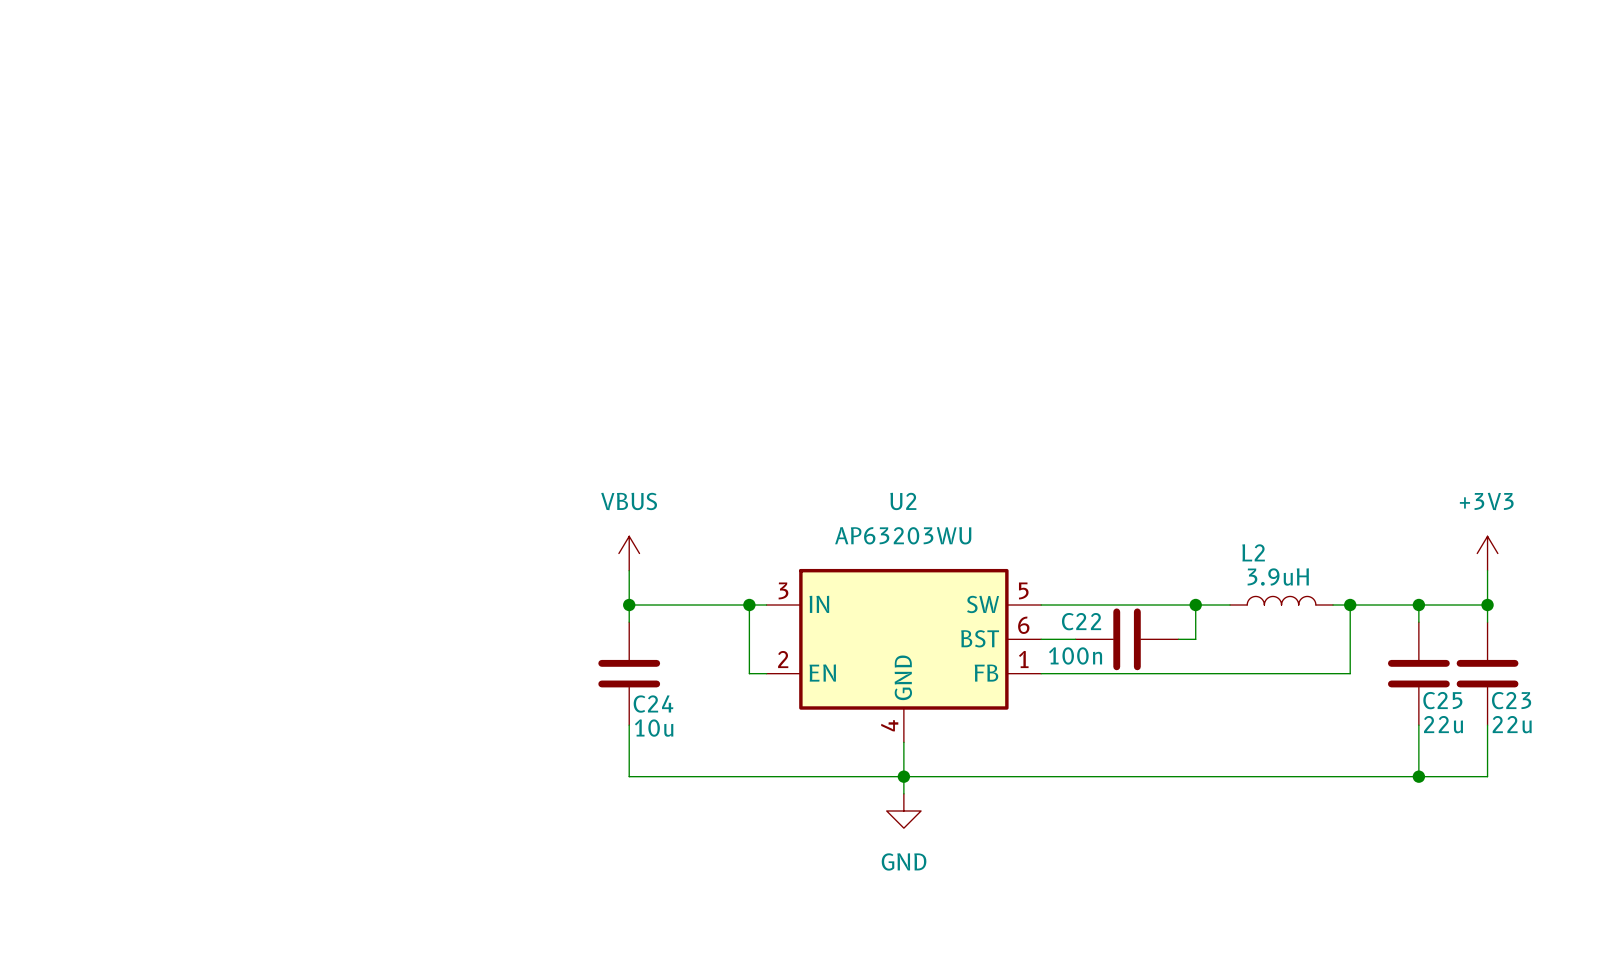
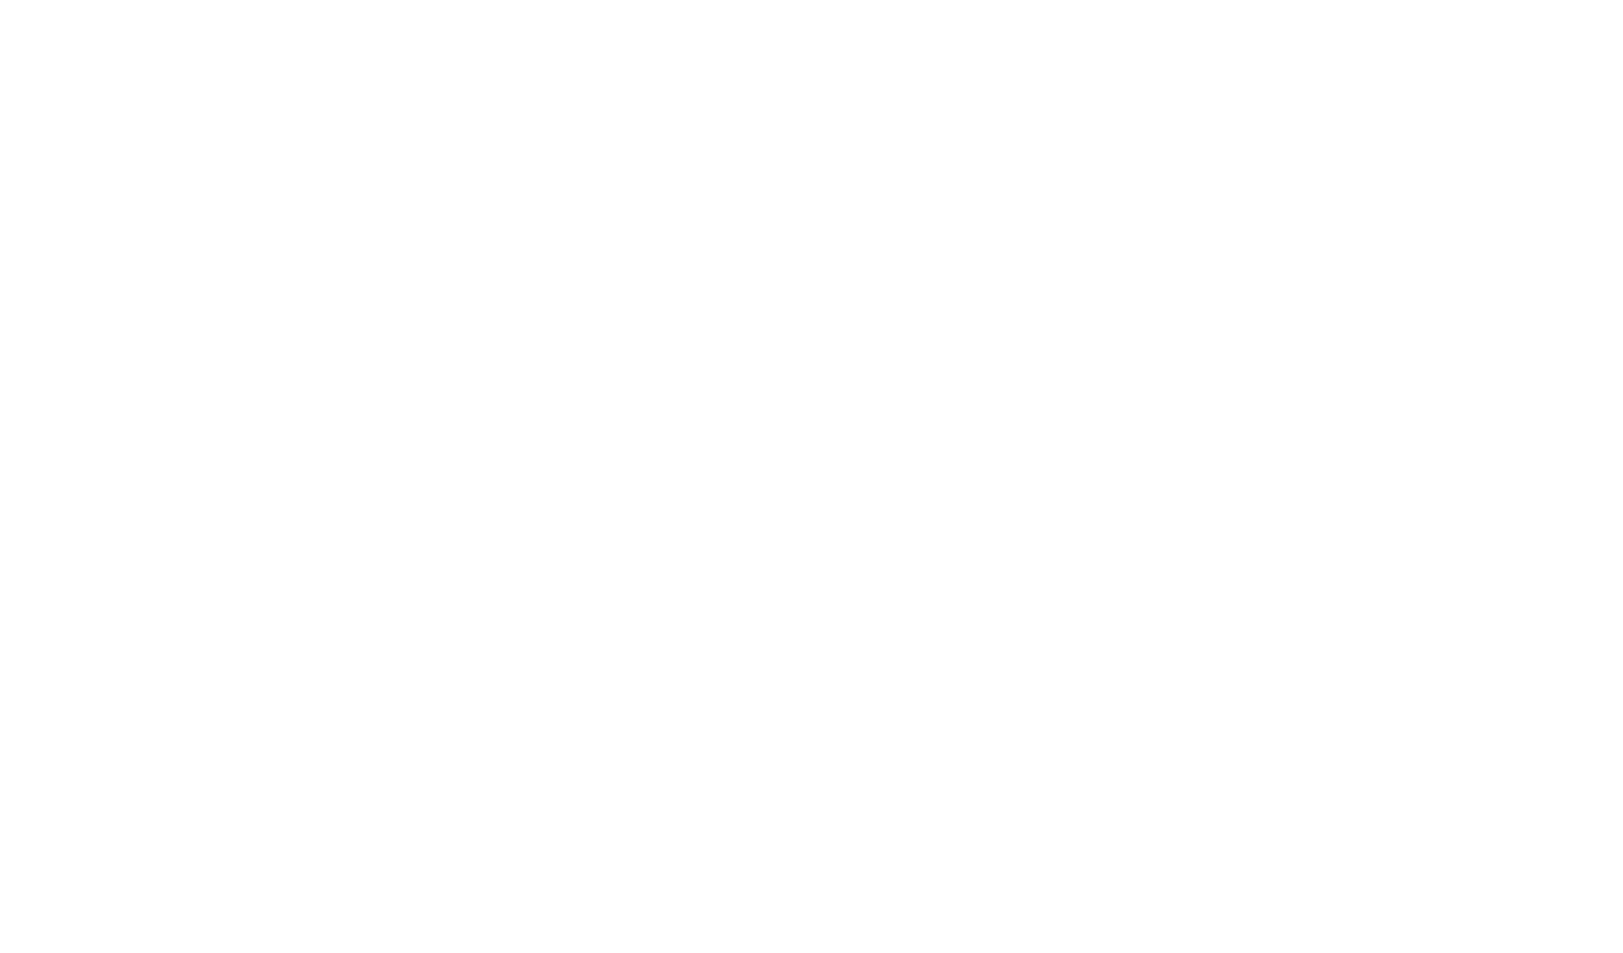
power symbol: VBUS (629, 553) -> none
power symbol: +3V3 (1487, 553) -> none
wire: (629, 570) (629, 622) -> none
wire: (1487, 570) (1487, 622) -> none
L2: 3.9uH (1281, 600) -> none
wire: (629, 605) (766, 605) -> none
junction: (629, 605) -> none
wire: (749, 605) (749, 673) (766, 673) -> none
junction: (749, 605) -> none
wire: (1041, 605) (1230, 605) -> none
wire: (1195, 605) (1195, 639) (1178, 639) -> none
junction: (1195, 605) -> none
wire: (1333, 605) (1487, 605) -> none
wire: (1350, 605) (1350, 673) (1041, 673) -> none
junction: (1350, 605) -> none
wire: (1418, 605) (1418, 622) -> none
junction: (1418, 605) -> none
junction: (1487, 605) -> none
wire: (1041, 639) (1075, 639) -> none
C22: 100n (1127, 639) -> none
U2: AP63203WU (903, 655) -> none
C24: 10u (629, 673) -> none
C25: 22u (1418, 673) -> none
C23: 22u (1487, 673) -> none
wire: (629, 725) (629, 776) (1487, 776) (1487, 725) -> none
wire: (1418, 725) (1418, 776) -> none
wire: (903, 742) (903, 793) -> none
junction: (903, 776) -> none
junction: (1418, 776) -> none
power symbol: GND (903, 811) -> none

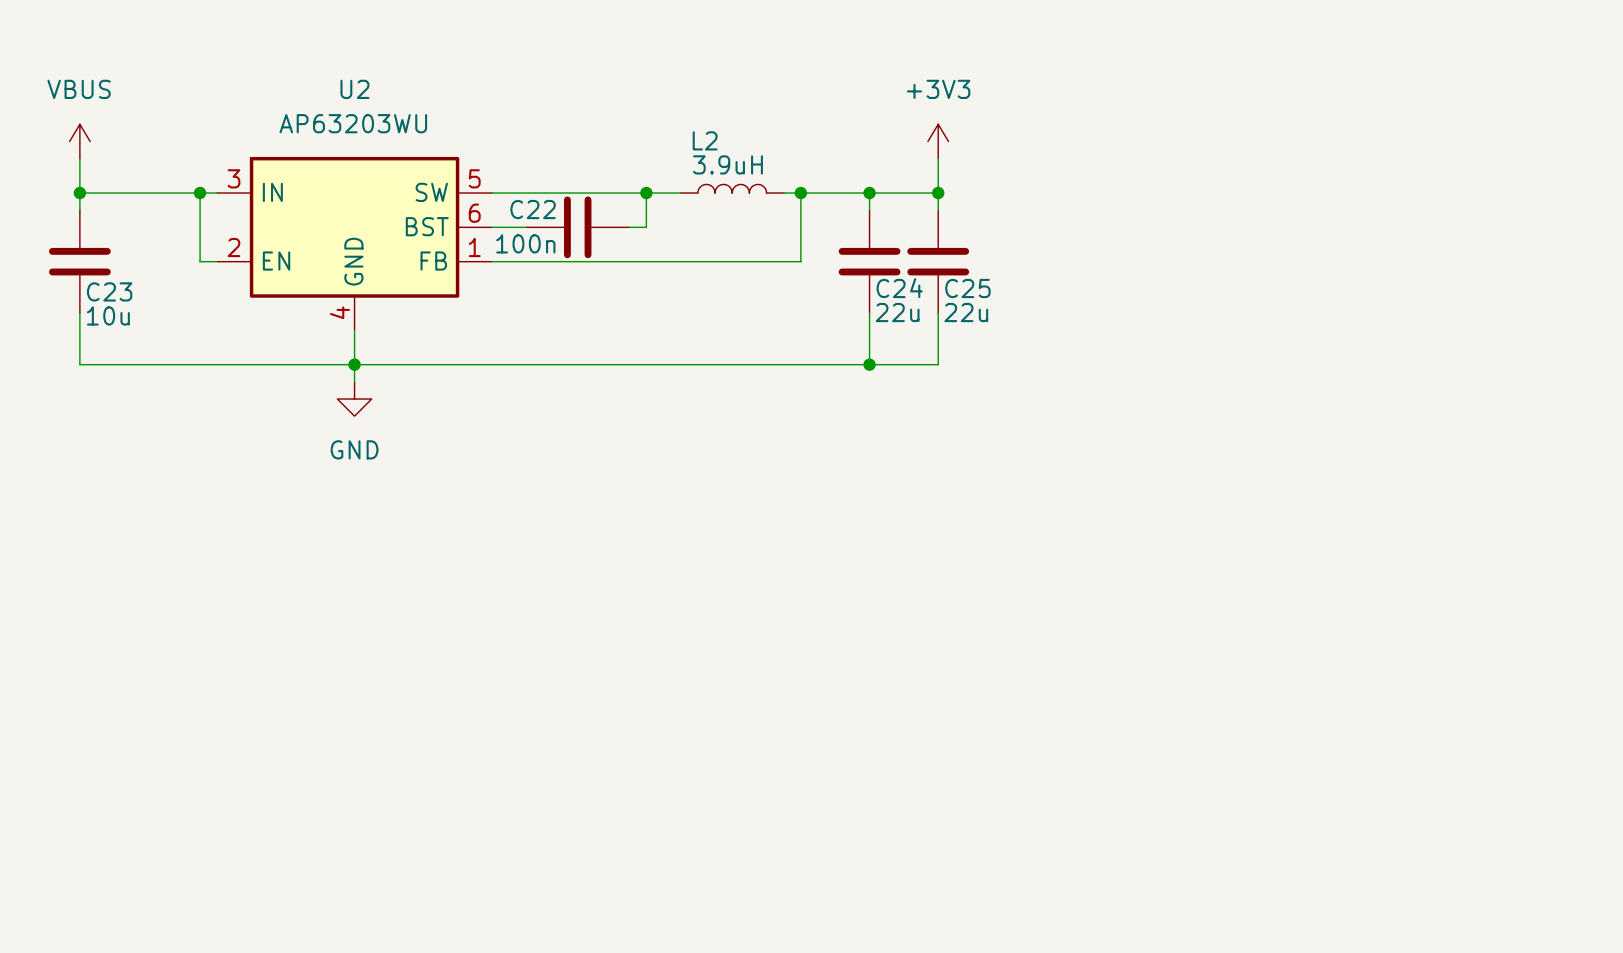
power symbol: none -> VBUS (79, 141)
power symbol: none -> +3V3 (938, 141)
wire: none -> (79, 158) (79, 210)
wire: none -> (938, 158) (938, 210)
L2: none -> 3.9uH (732, 188)
wire: none -> (79, 193) (217, 193)
junction: none -> (79, 193)
wire: none -> (200, 193) (200, 261) (217, 261)
junction: none -> (200, 193)
wire: none -> (491, 193) (680, 193)
wire: none -> (646, 193) (646, 227) (629, 227)
junction: none -> (646, 193)
wire: none -> (783, 193) (938, 193)
wire: none -> (800, 193) (800, 261) (491, 261)
junction: none -> (800, 193)
wire: none -> (869, 193) (869, 210)
junction: none -> (869, 193)
junction: none -> (938, 193)
wire: none -> (491, 227) (526, 227)
C22: none -> 100n (577, 227)
U2: none -> AP63203WU (354, 243)
C23: none -> 10u (79, 261)
C24: none -> 22u (869, 261)
C25: none -> 22u (938, 261)
wire: none -> (79, 313) (79, 364) (938, 364) (938, 313)
wire: none -> (869, 313) (869, 364)
wire: none -> (354, 330) (354, 381)
junction: none -> (354, 364)
junction: none -> (869, 364)
power symbol: none -> GND (354, 399)

